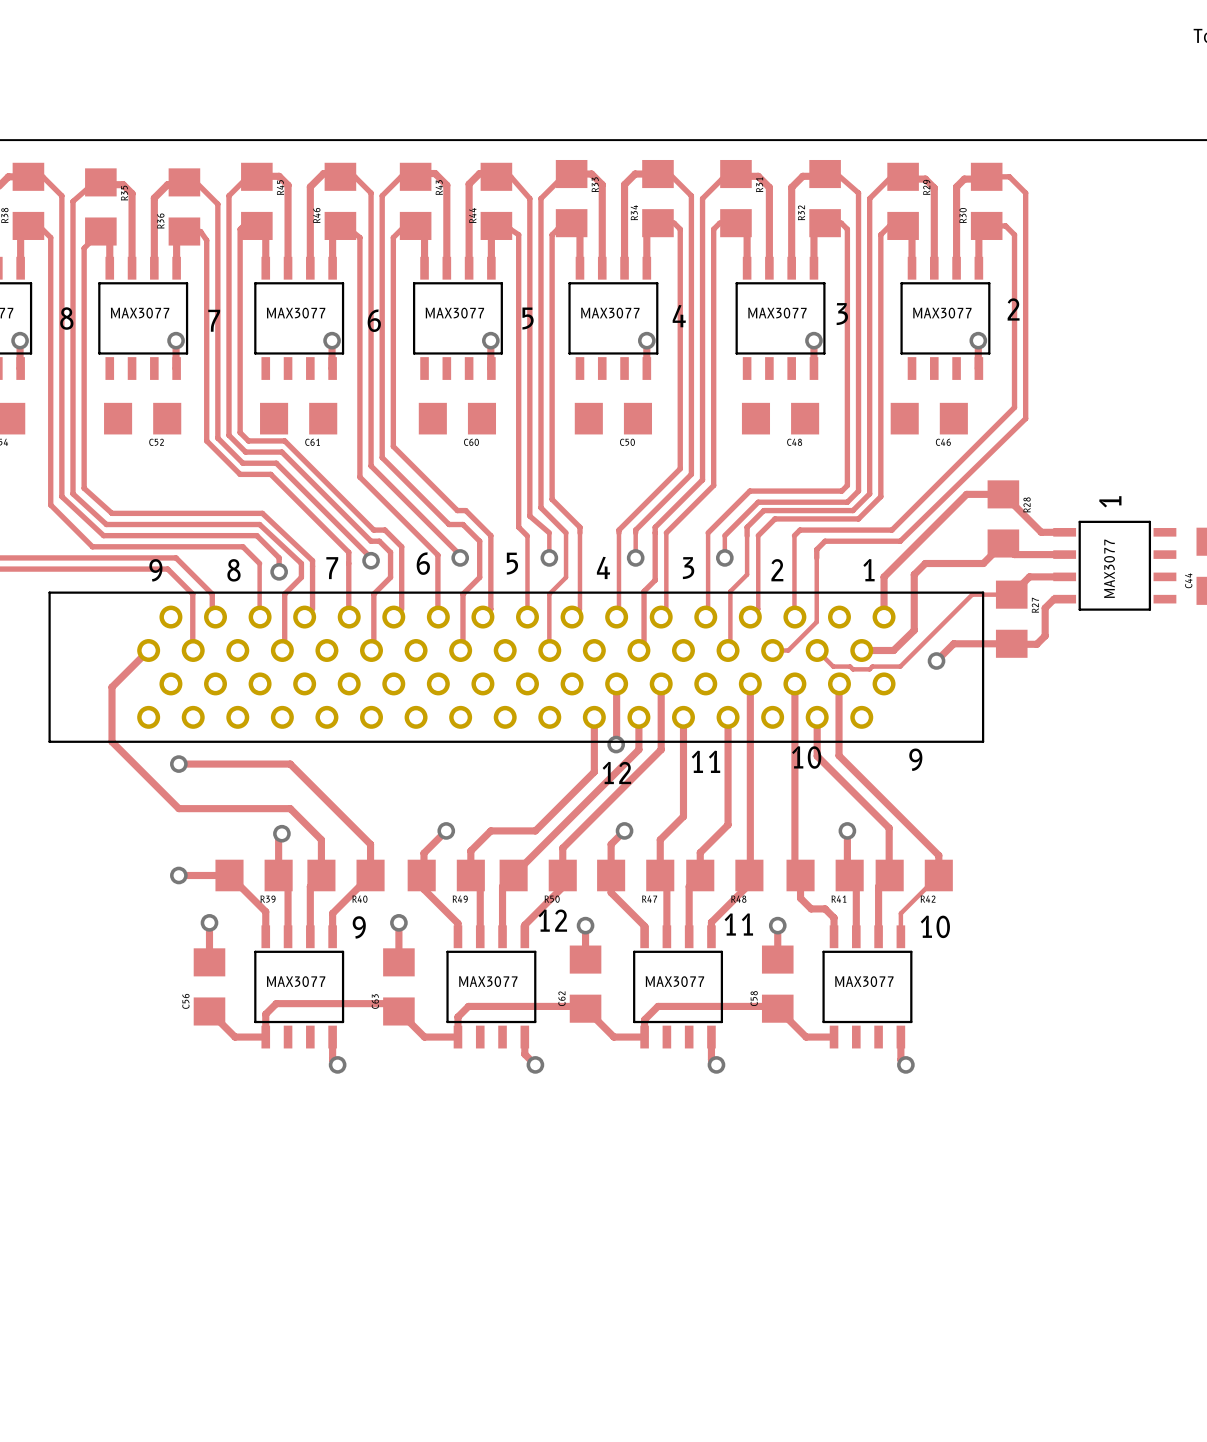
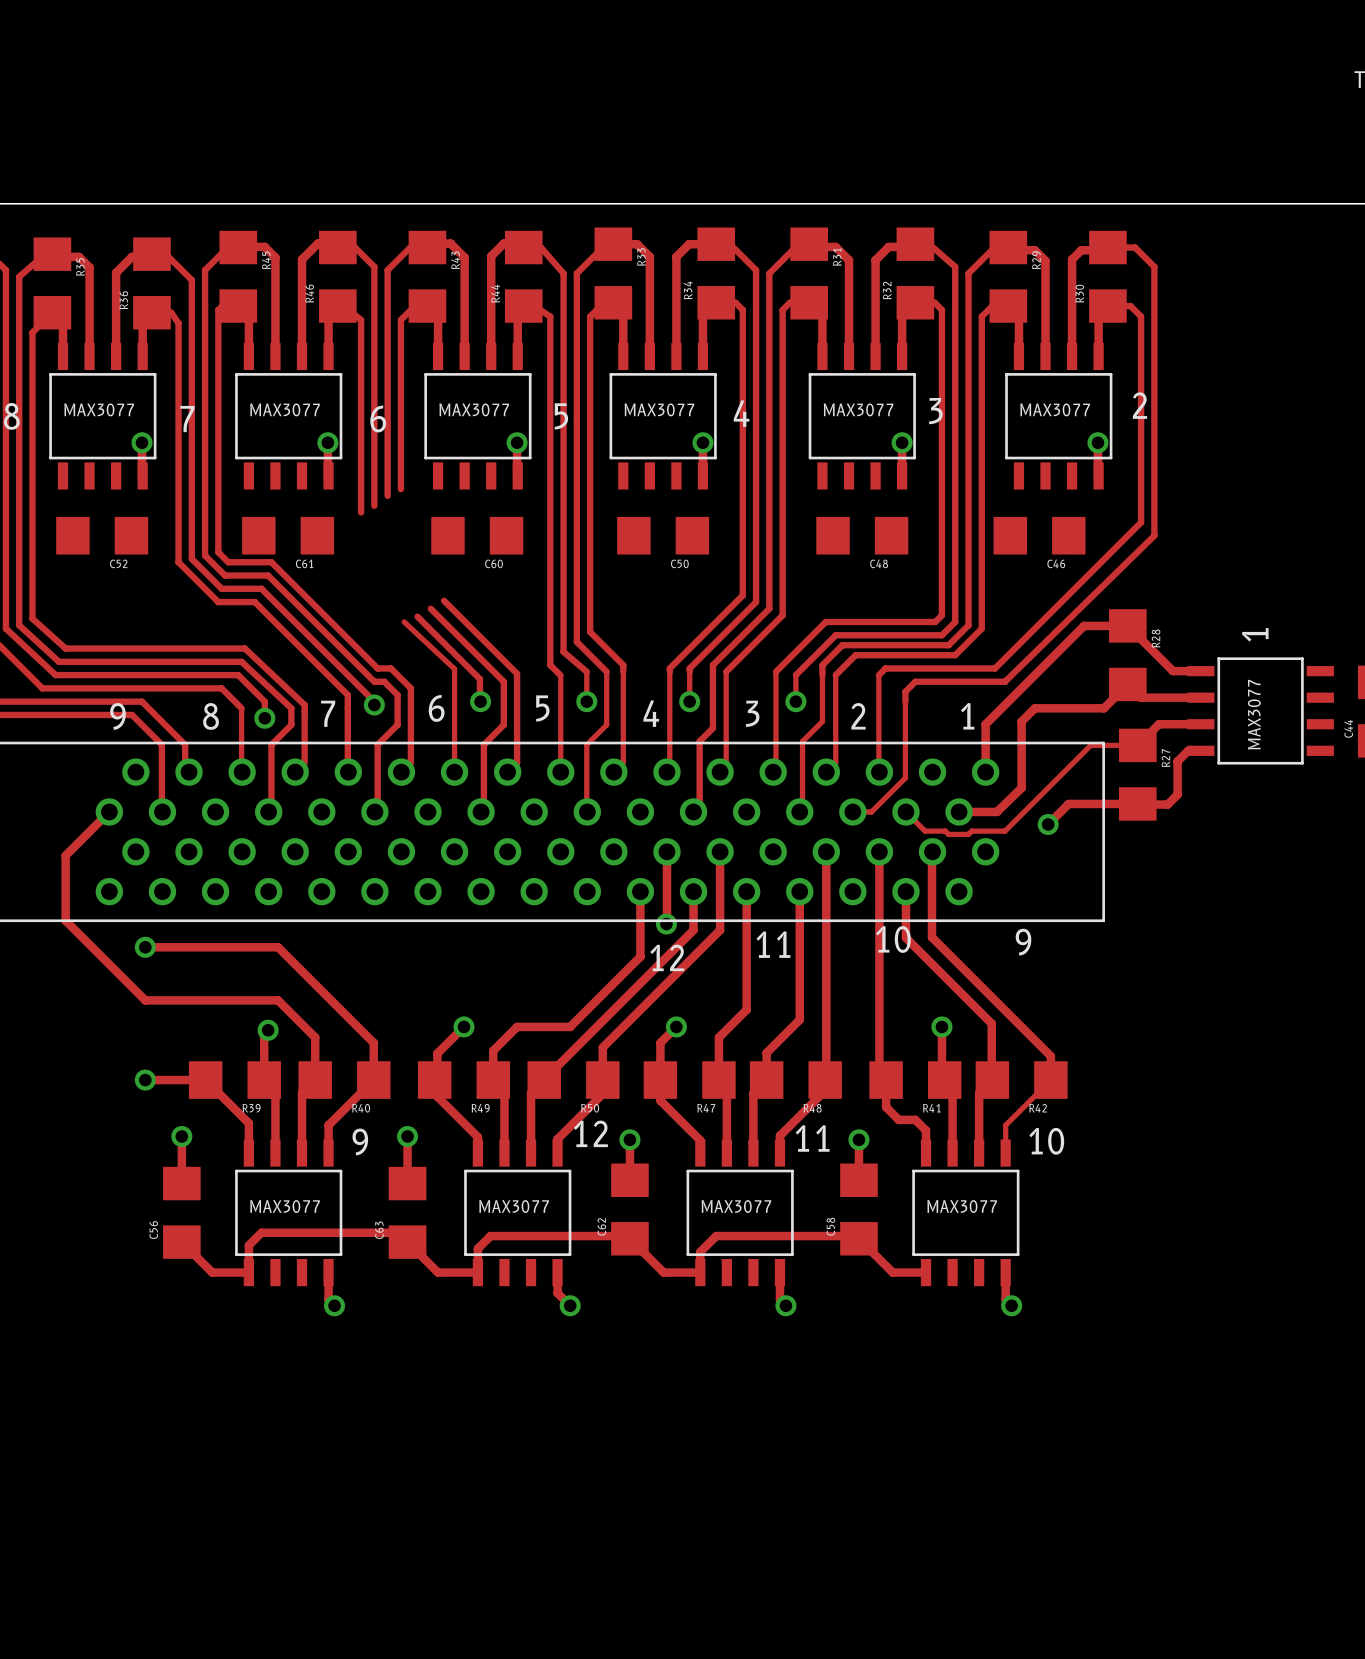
track: (393, 379) (393, 446) (457, 510) (465, 510) (490, 535) -> (444, 600) (517, 675)
track: (382, 385) (382, 457) (449, 524) (462, 524) -> (430, 608) (483, 661)
track: (371, 393) (371, 466) (460, 555) (460, 557) -> (417, 616) (479, 679) (480, 701)
track: (359, 399) (359, 477) (437, 555) (438, 617) -> (404, 622) (454, 669) (454, 772)

